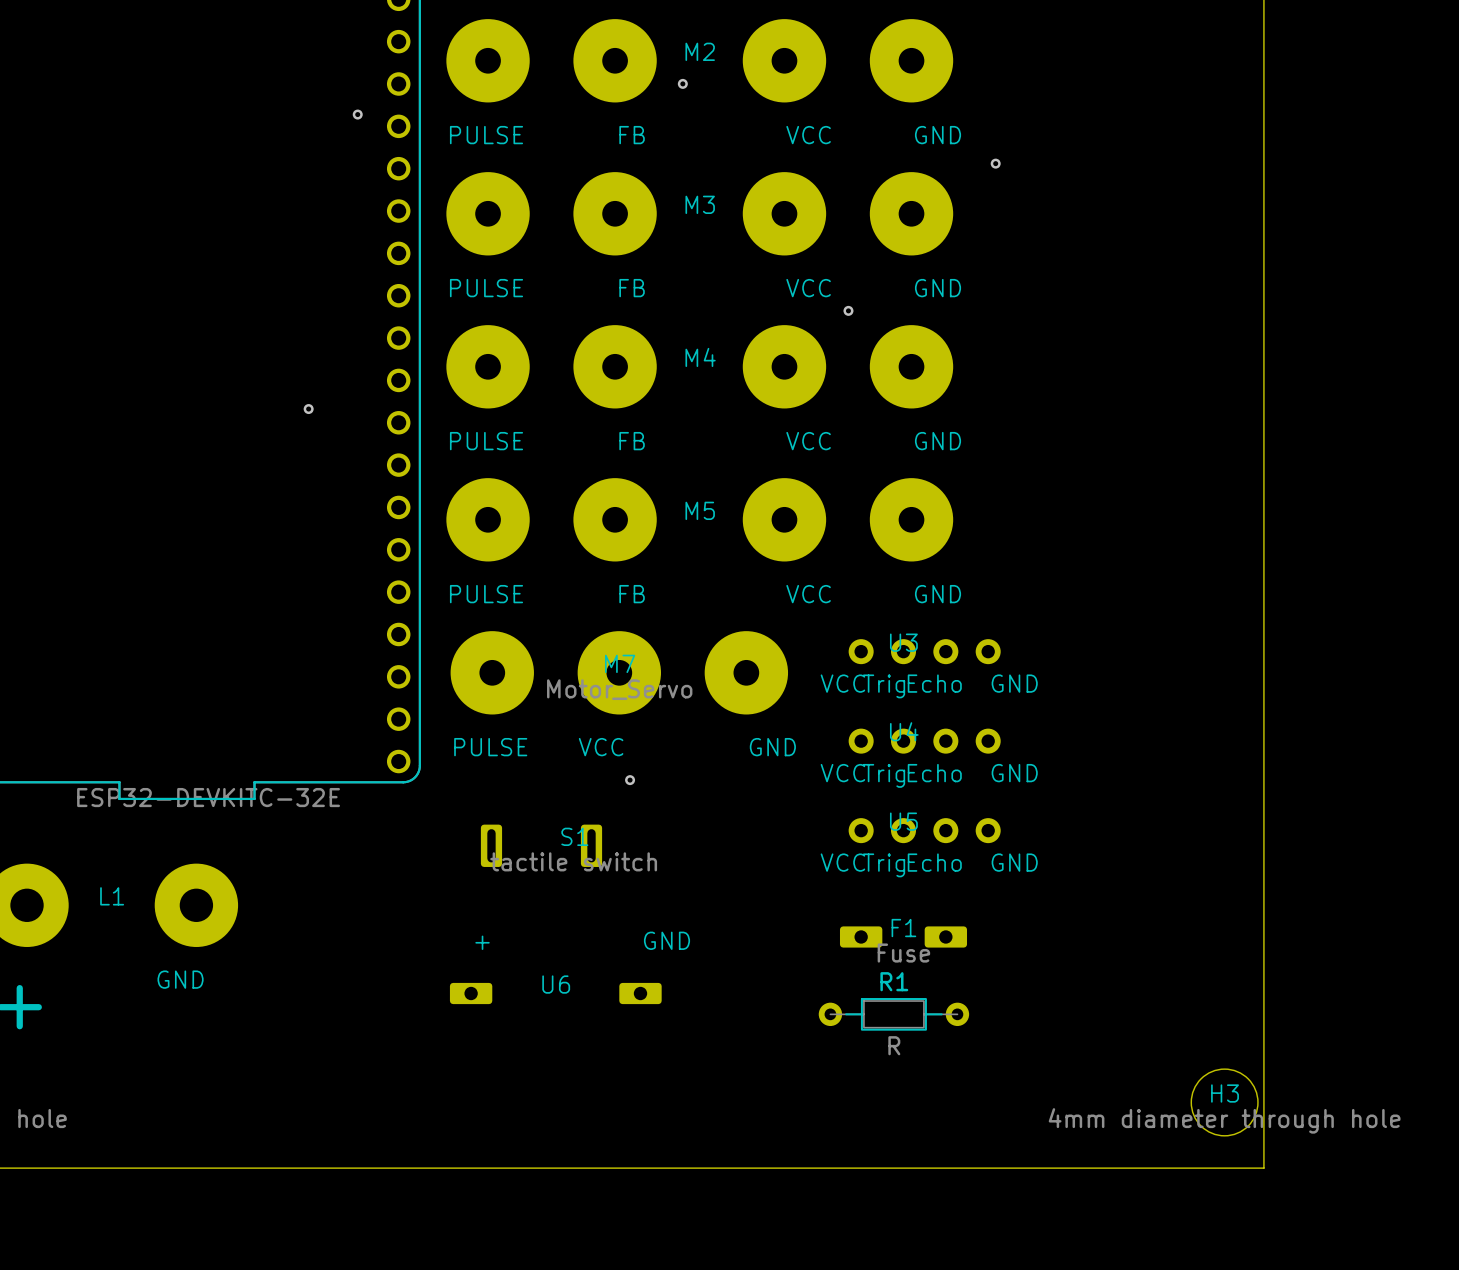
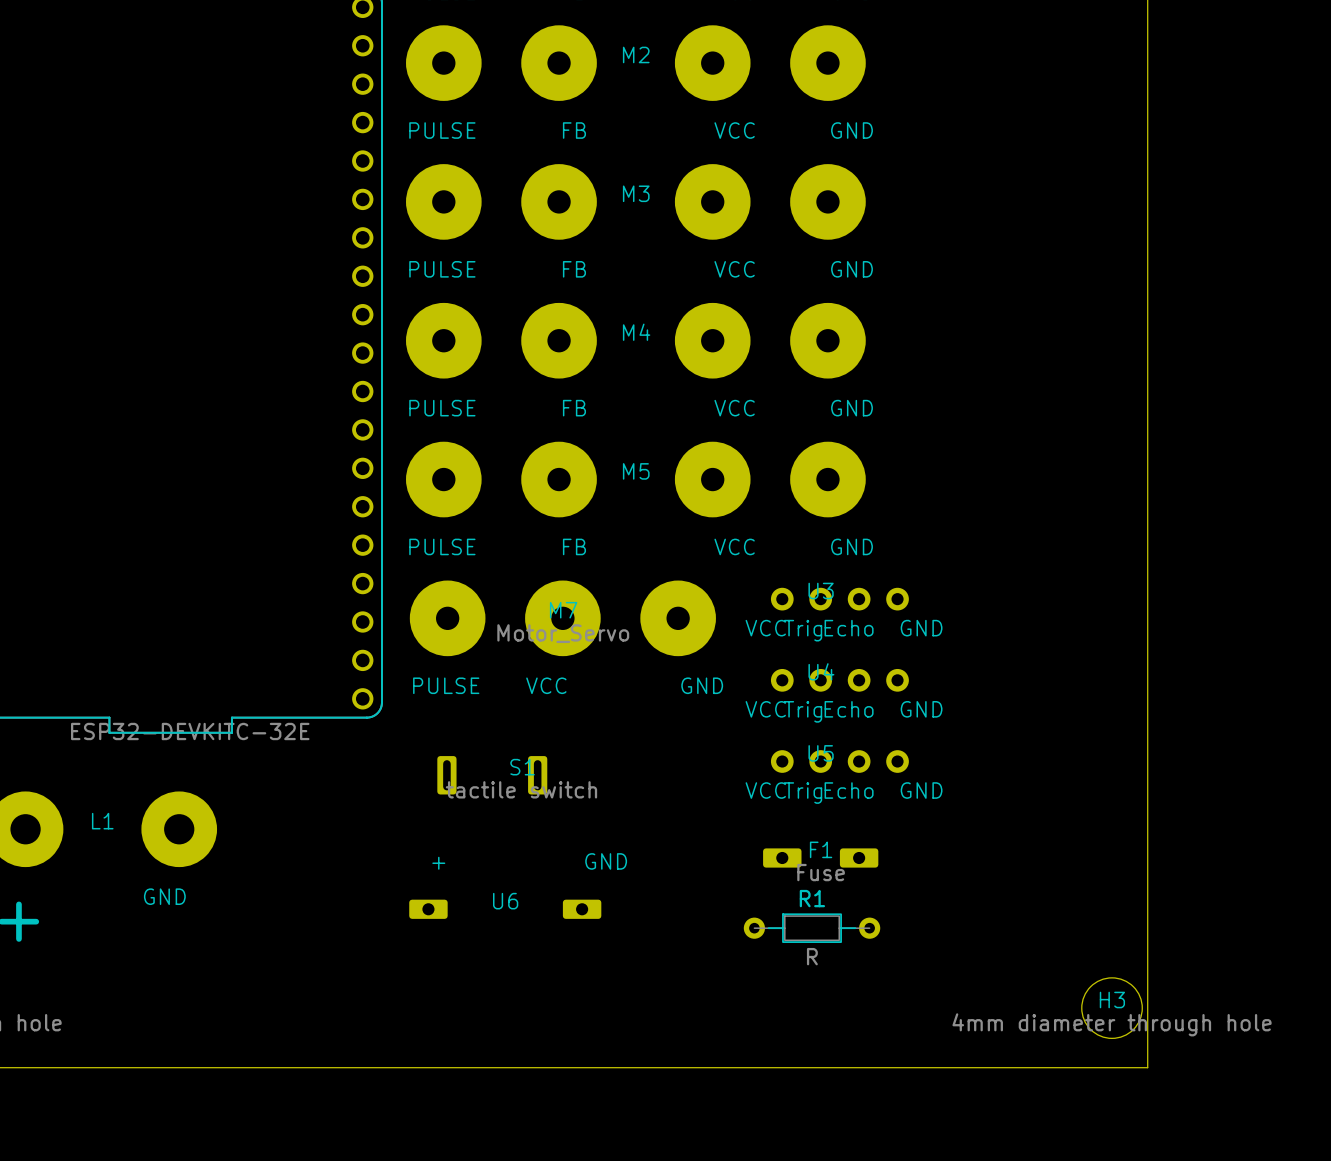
via: (682, 83) -> none
via: (357, 114) -> none
via: (995, 163) -> none
via: (848, 310) -> none
via: (308, 409) -> none
via: (630, 780) -> none

